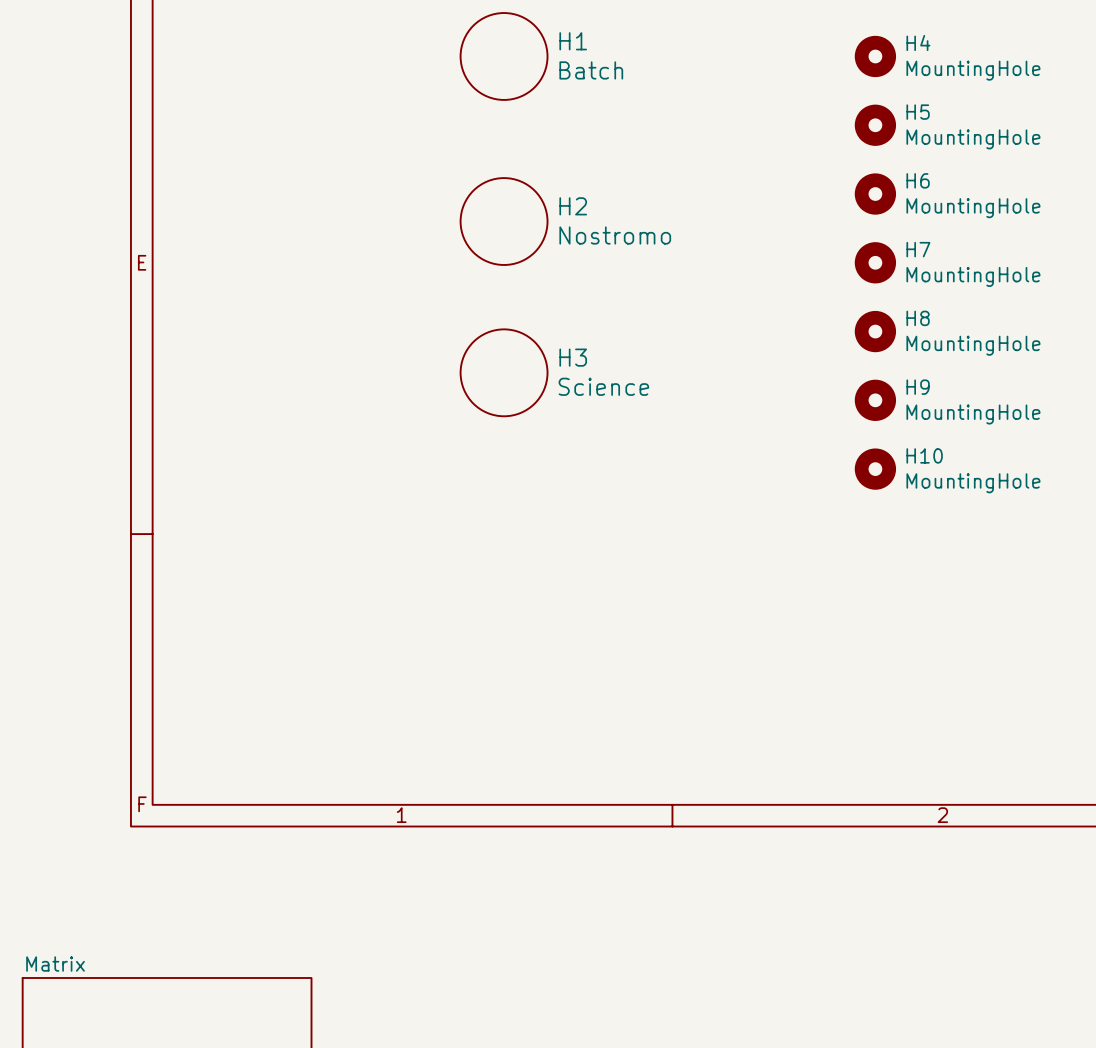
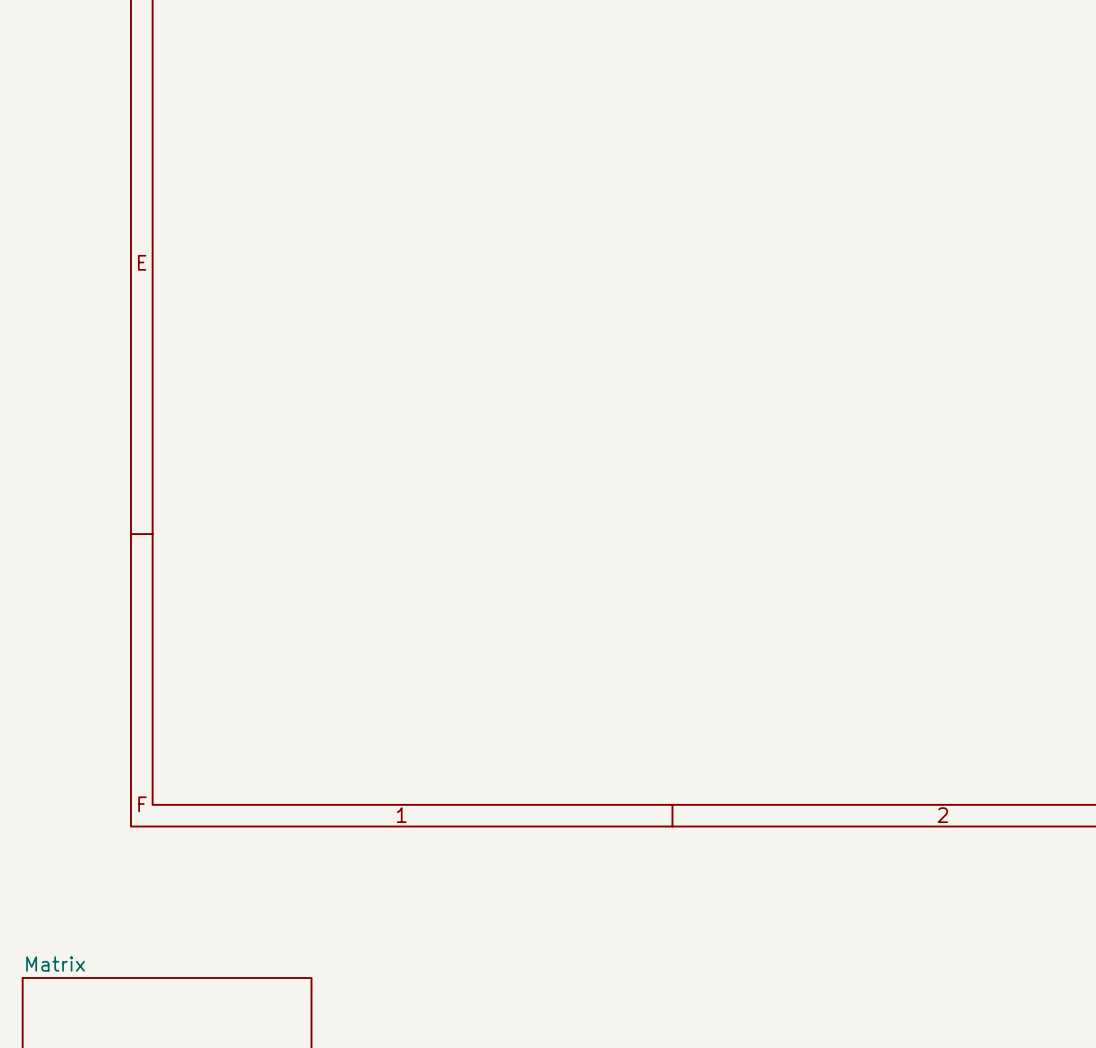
H1: Batch (504, 56) -> none
H4: MountingHole (875, 56) -> none
H5: MountingHole (875, 125) -> none
H6: MountingHole (875, 194) -> none
H2: Nostromo (504, 221) -> none
H7: MountingHole (875, 262) -> none
H8: MountingHole (875, 331) -> none
H3: Science (504, 372) -> none
H9: MountingHole (875, 400) -> none
H10: MountingHole (875, 469) -> none

